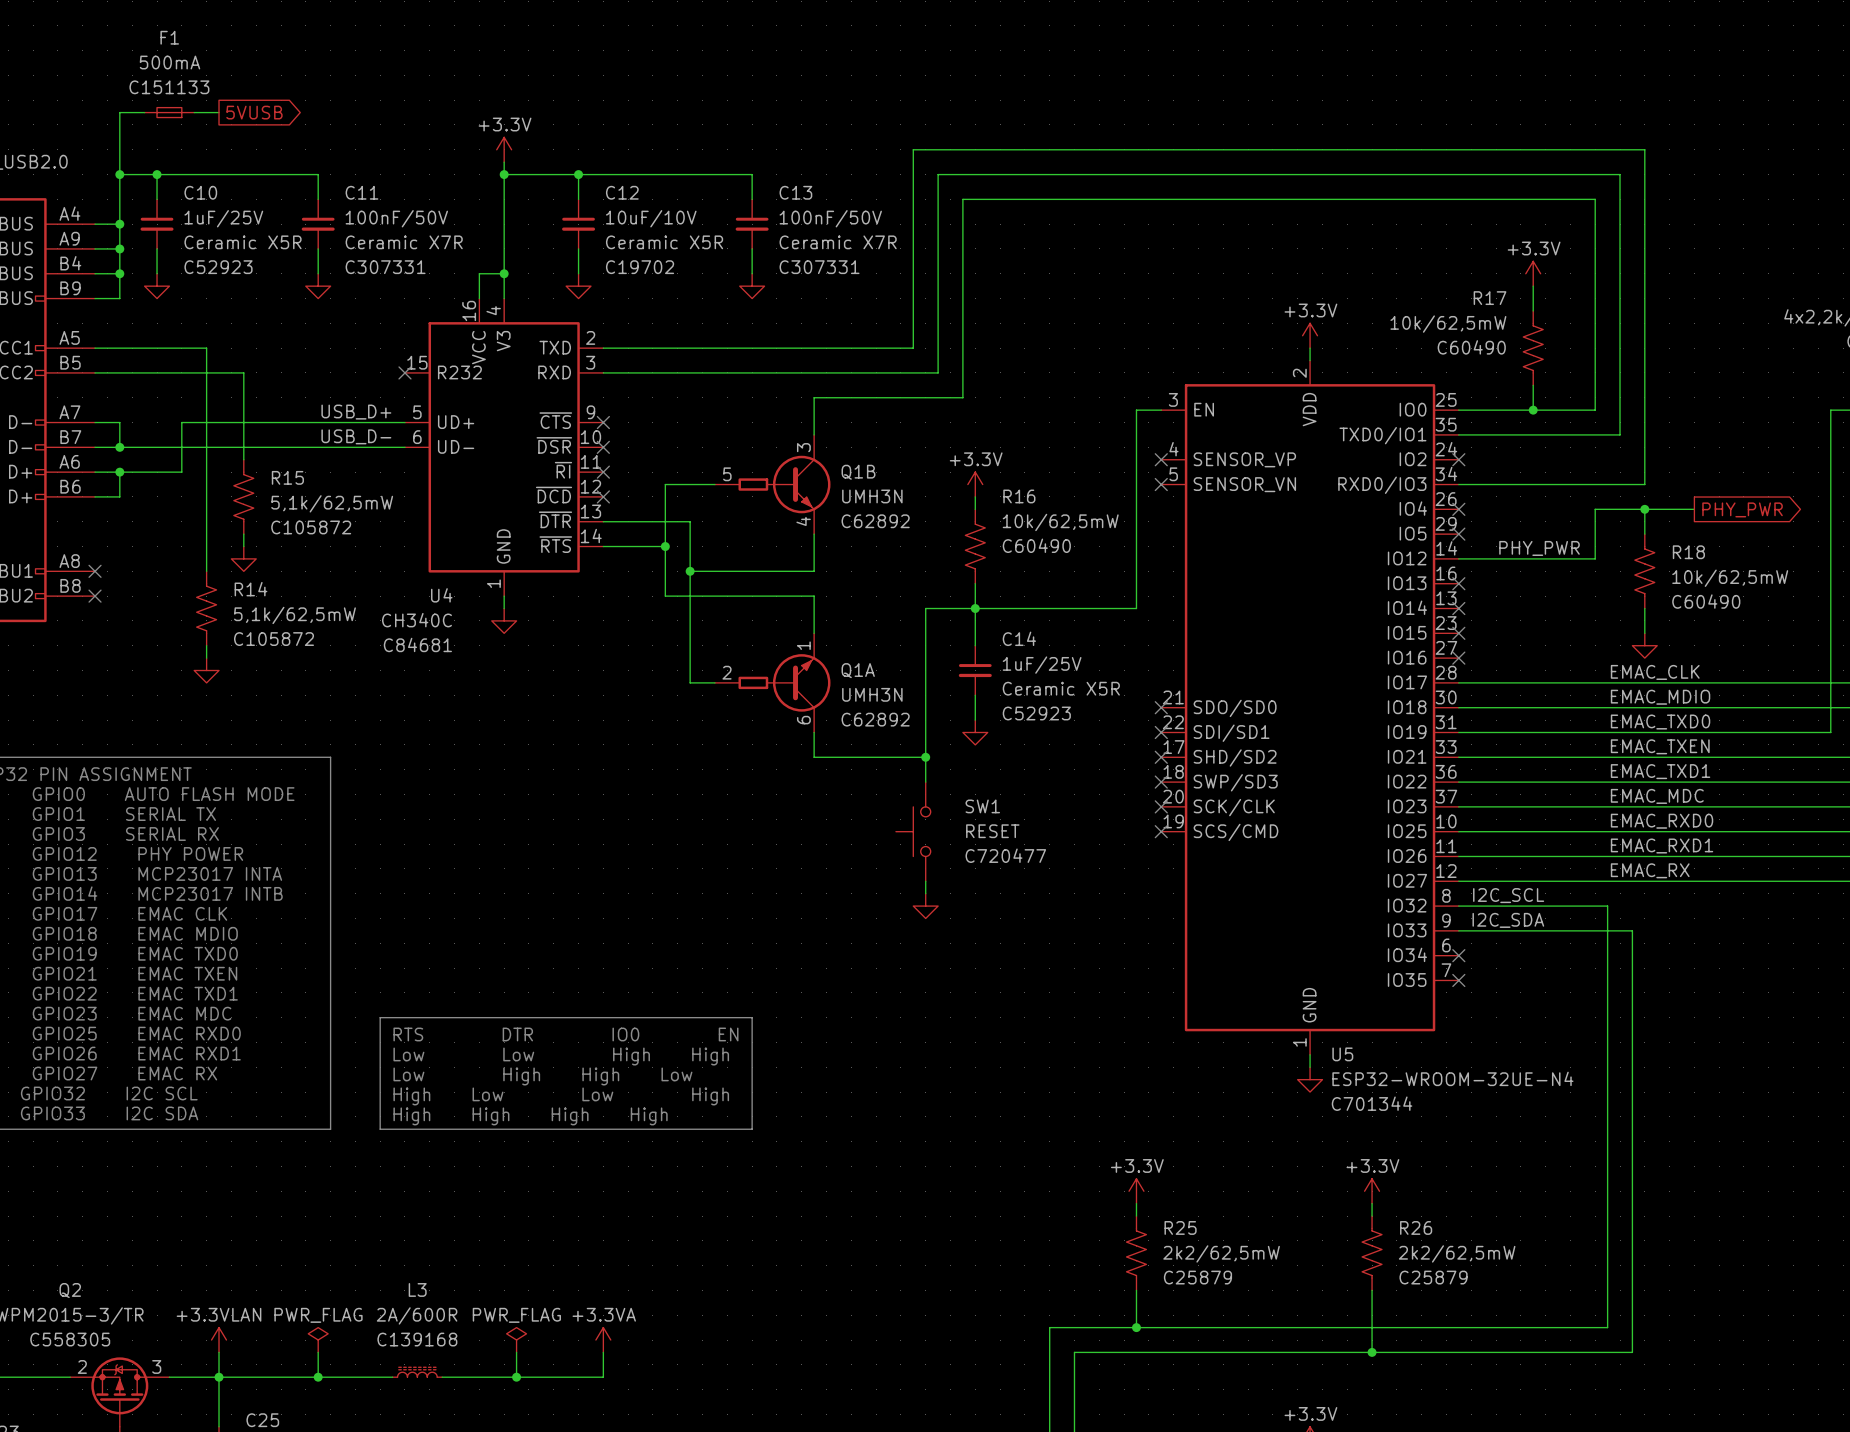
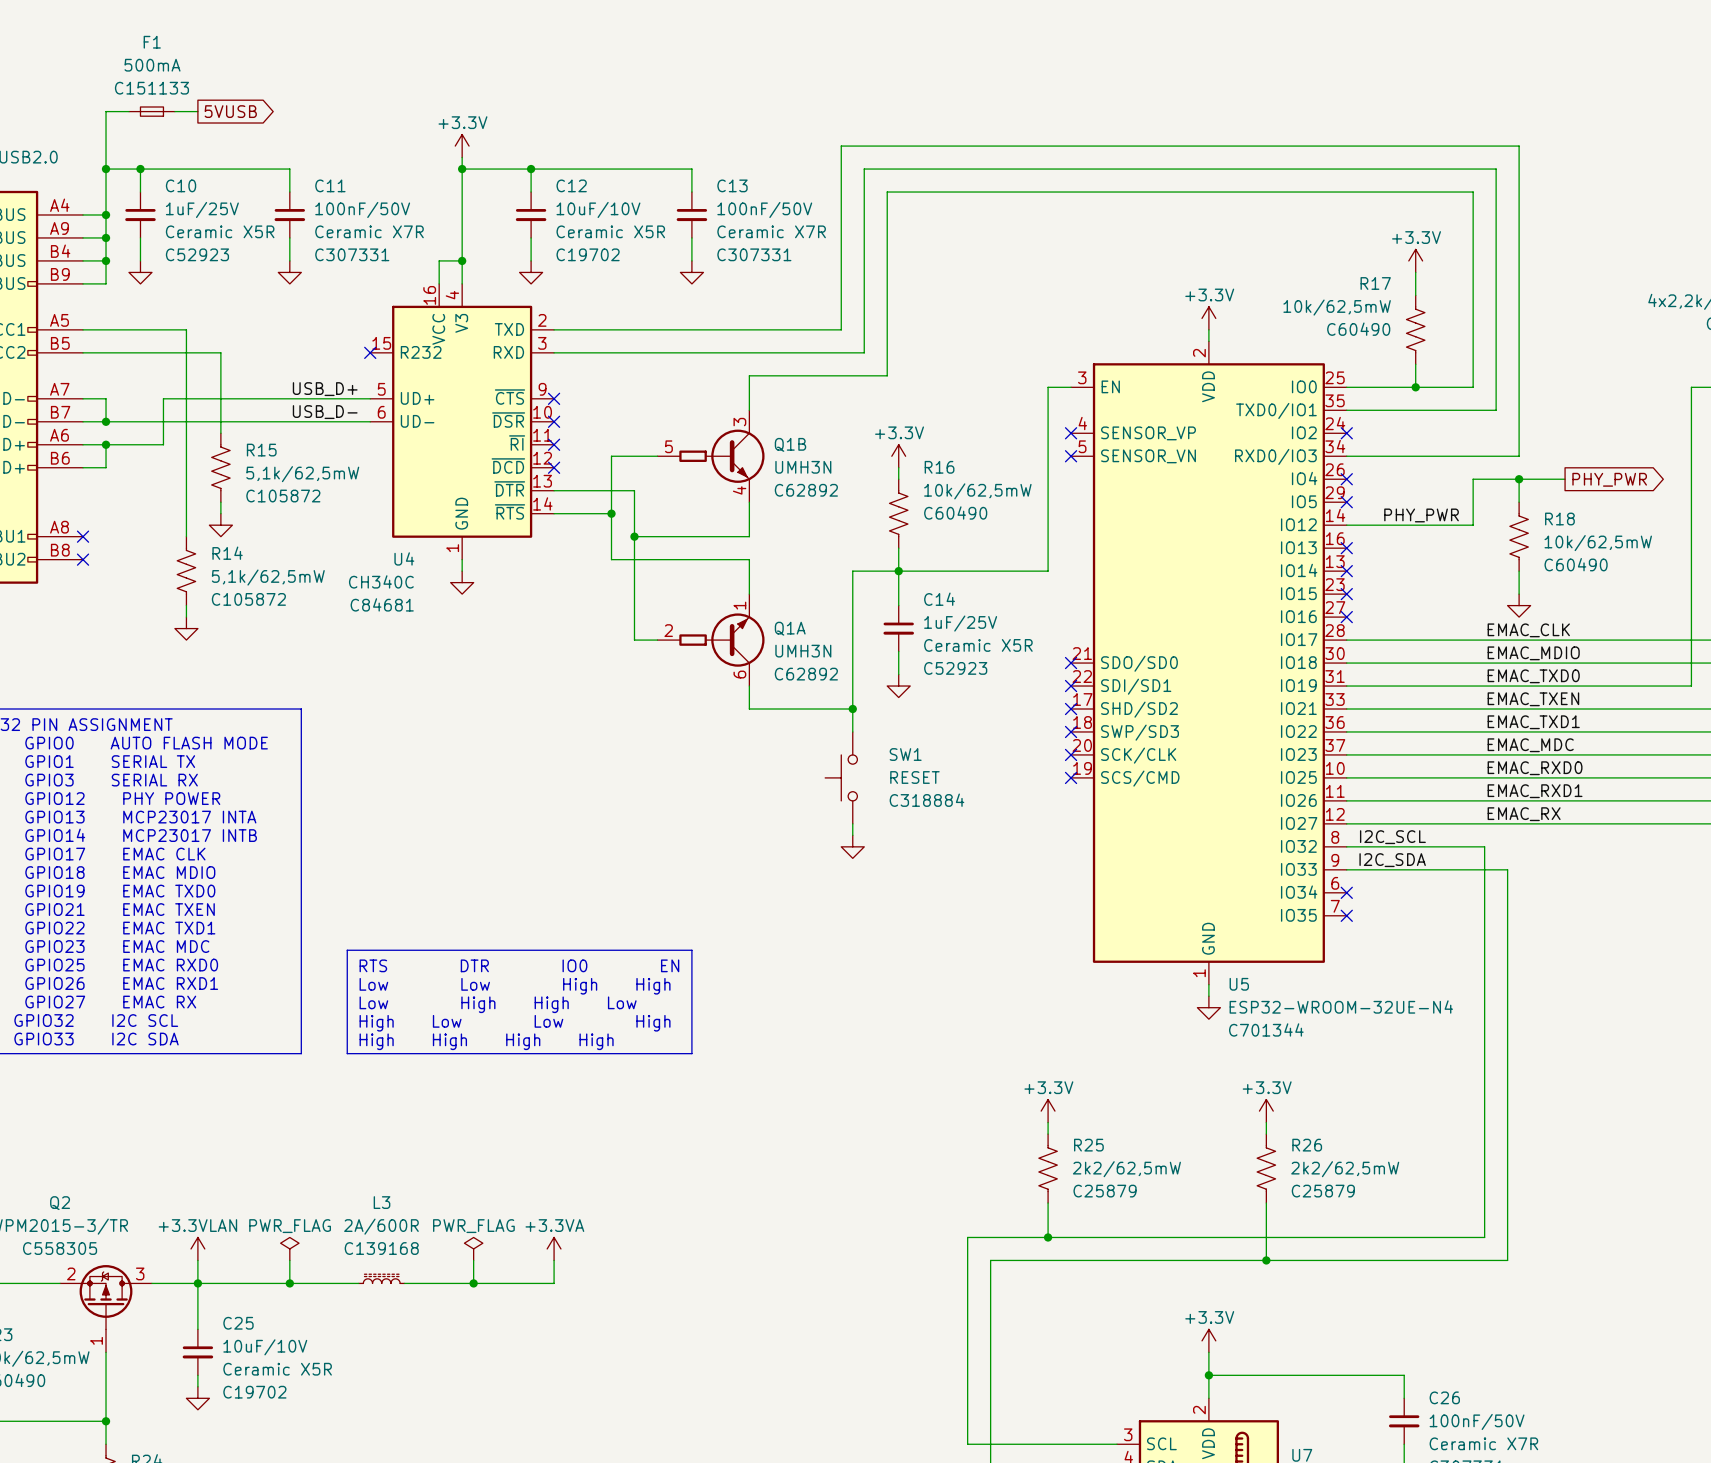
SW1 text: C720477 (1005, 855) -> C318884 (926, 800)

